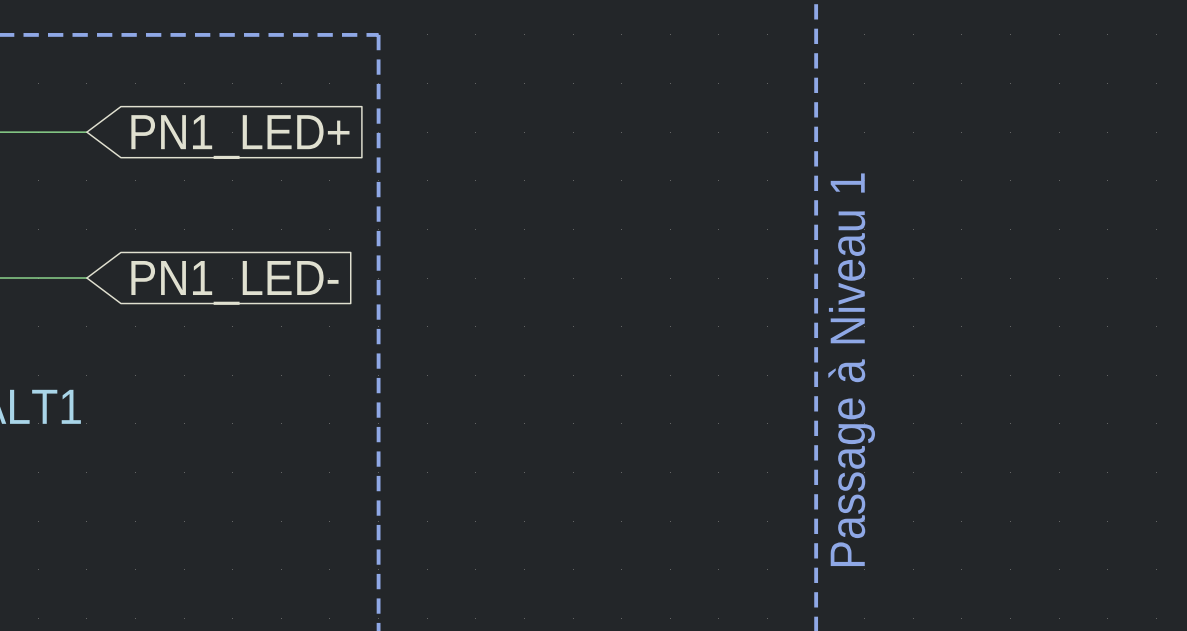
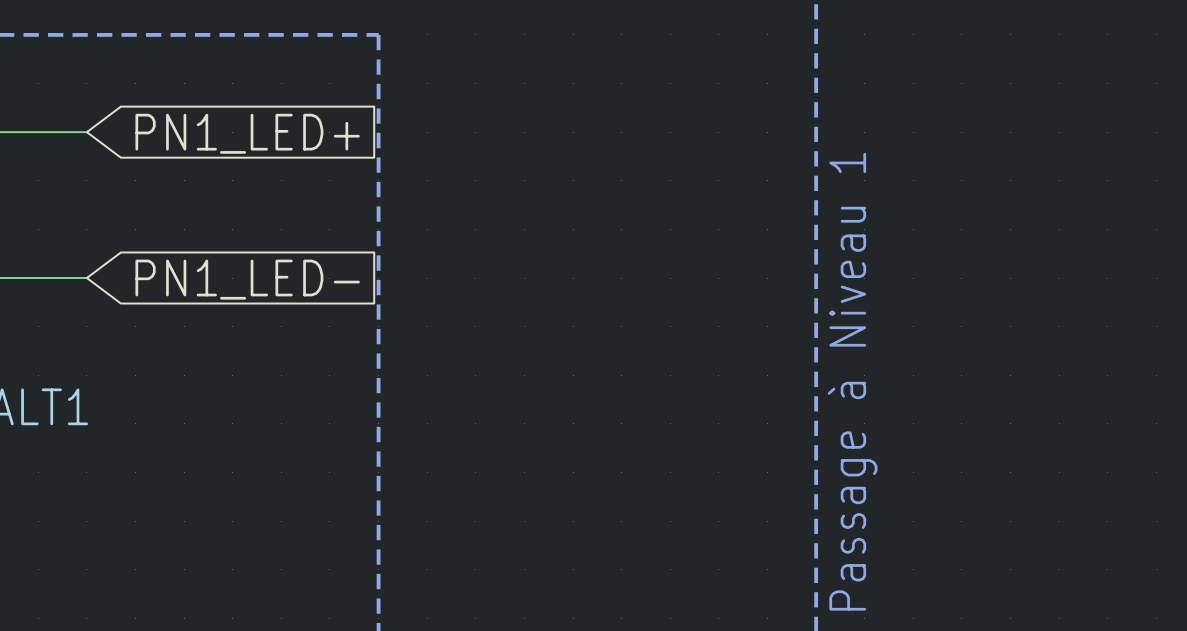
text position: Passage à Niveau 1 (851, 369) -> Passage à Niveau 1 (852, 381)

